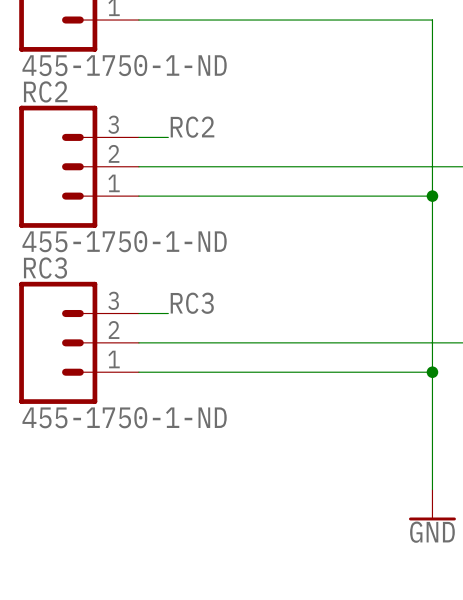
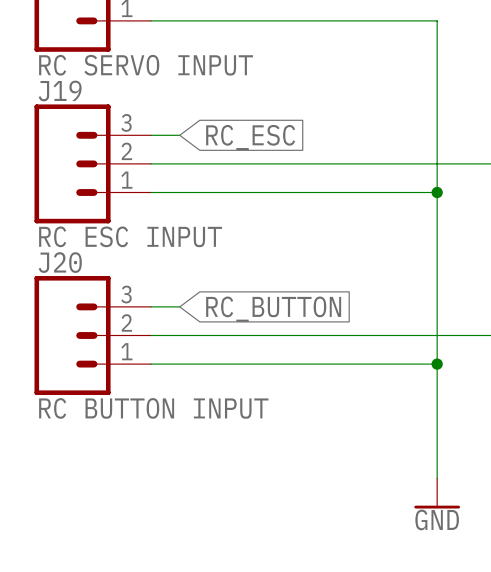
part value: 455-1750-1-ND (124, 65) -> RC SERVO INPUT (146, 65)
RC2 name: RC2 (45, 91) -> J19 (60, 90)
label: RC2 (192, 127) -> none
global label: none -> RC_ESC (250, 137)
RC2 value: 455-1750-1-ND (124, 241) -> RC ESC INPUT (130, 236)
RC3 name: RC3 (45, 268) -> J20 (60, 262)
label: RC3 (192, 303) -> none
global label: none -> RC_BUTTON (273, 309)
RC3 value: 455-1750-1-ND (124, 417) -> RC BUTTON INPUT (153, 408)

